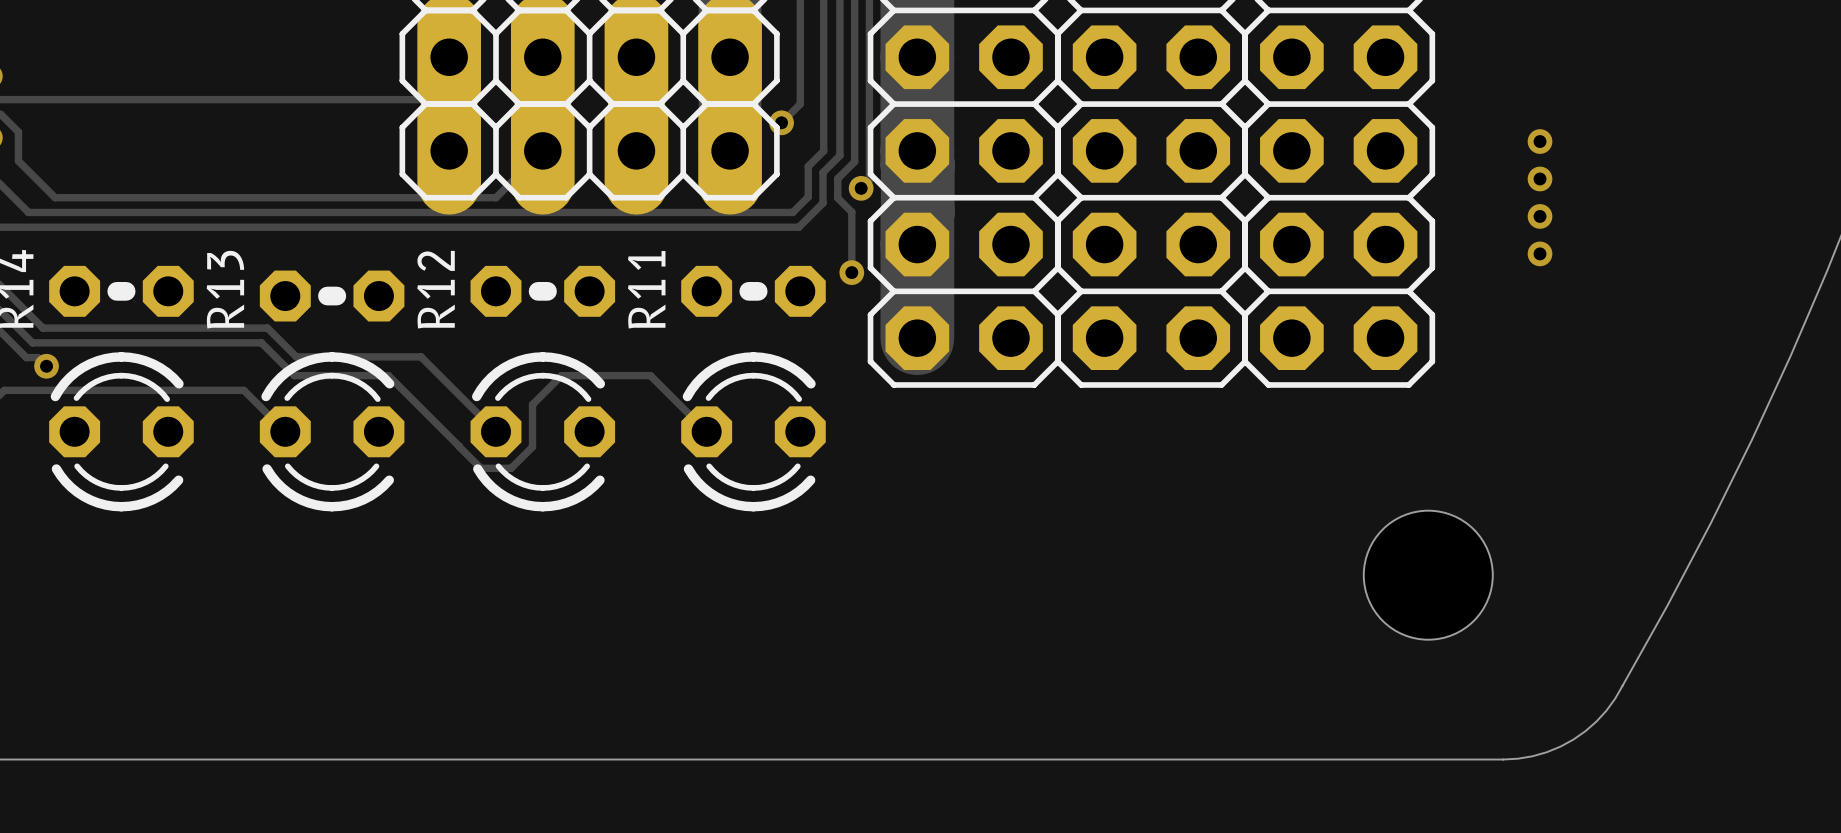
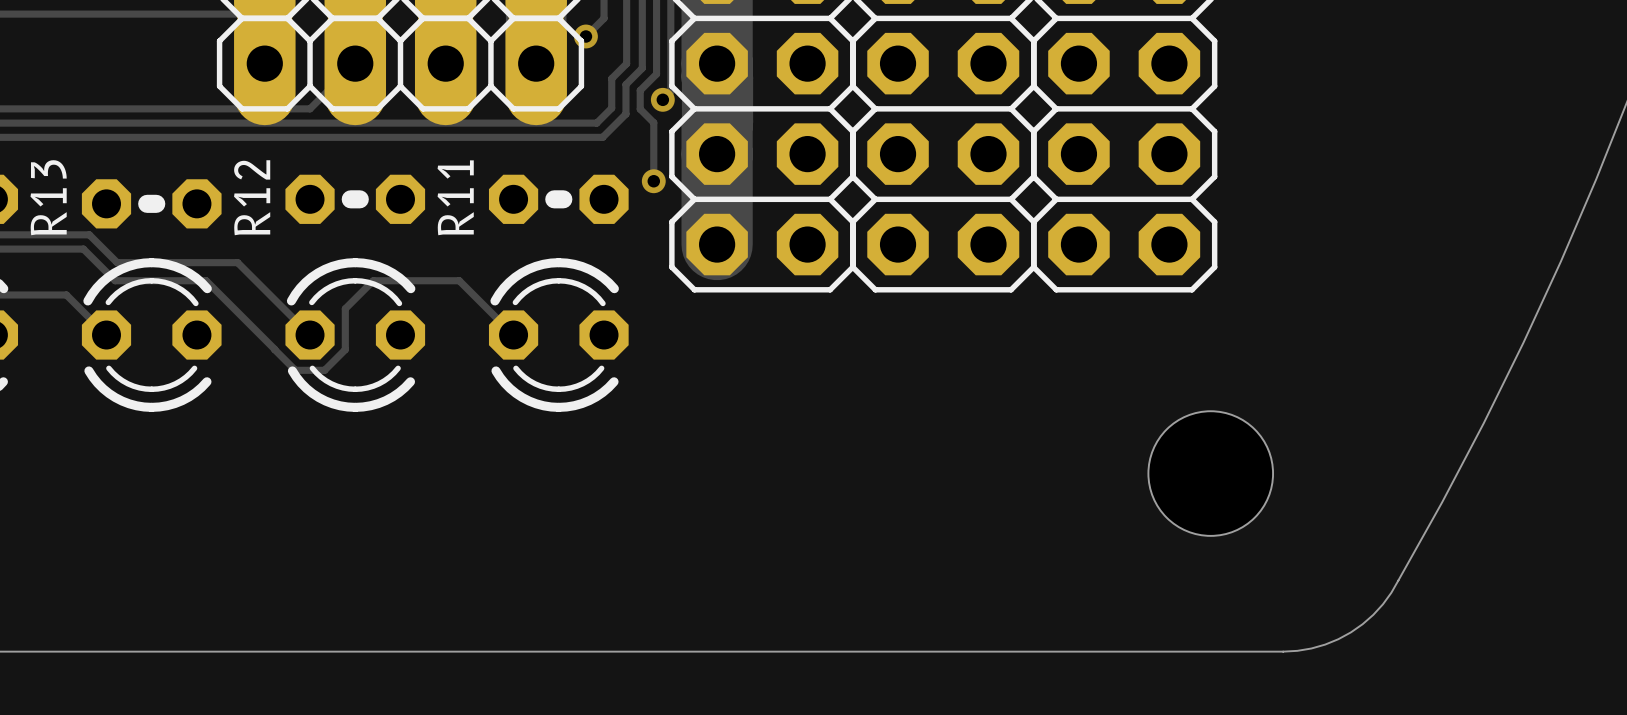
via: (1540, 141) -> none
via: (1540, 178) -> none
via: (1540, 216) -> none
via: (1540, 253) -> none

